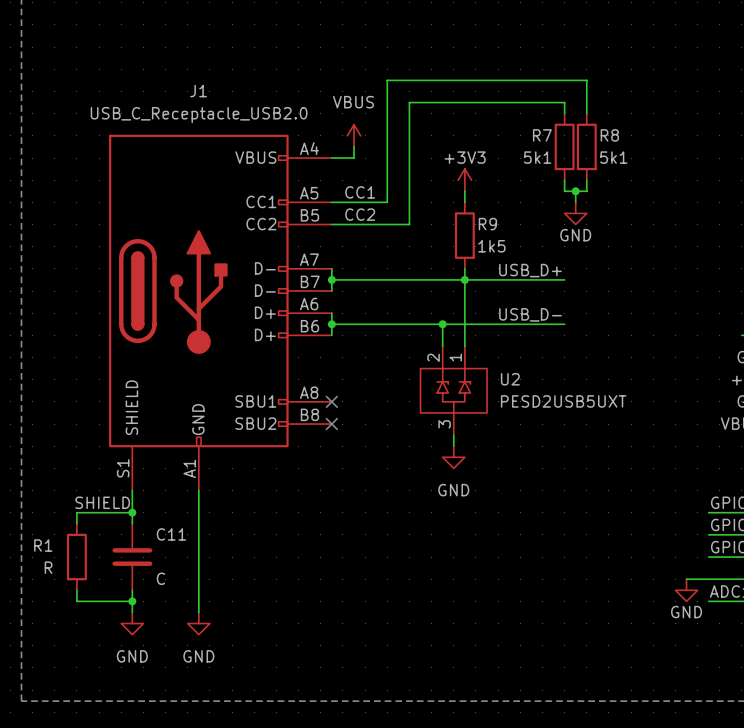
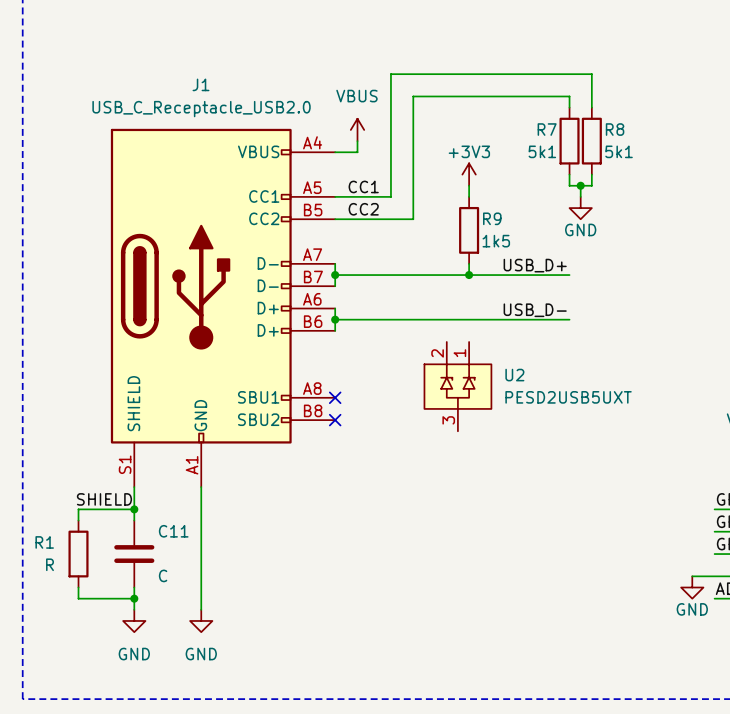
wire: (464, 279) (464, 346) -> none
wire: (442, 324) (442, 346) -> none
junction: (442, 324) -> none
wire: (453, 435) (453, 446) -> none
power symbol: GND (453, 457) -> none

